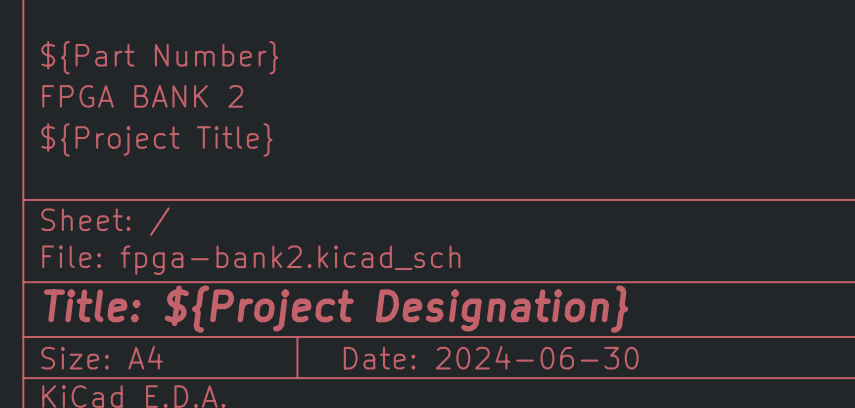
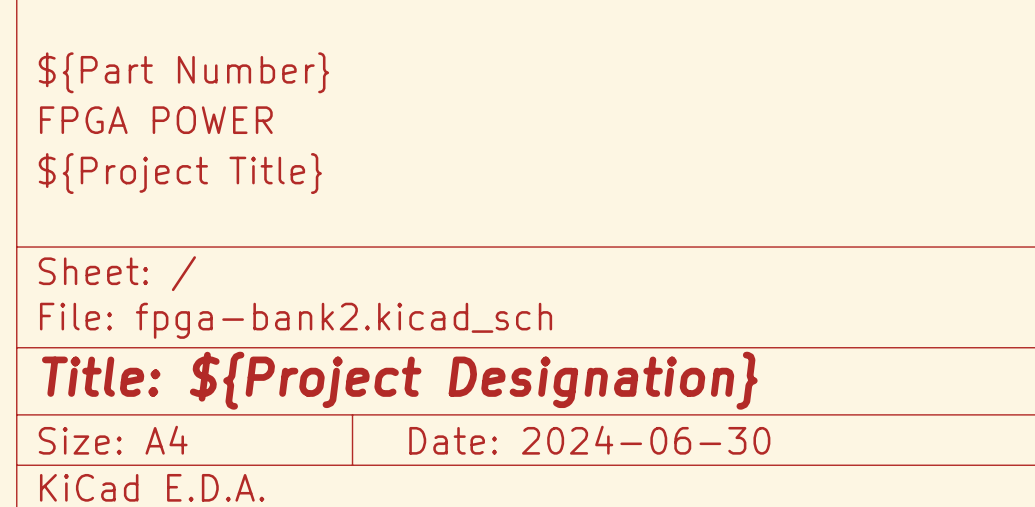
title block: FPGA BANK 2 (142, 96) -> FPGA POWER (156, 120)

